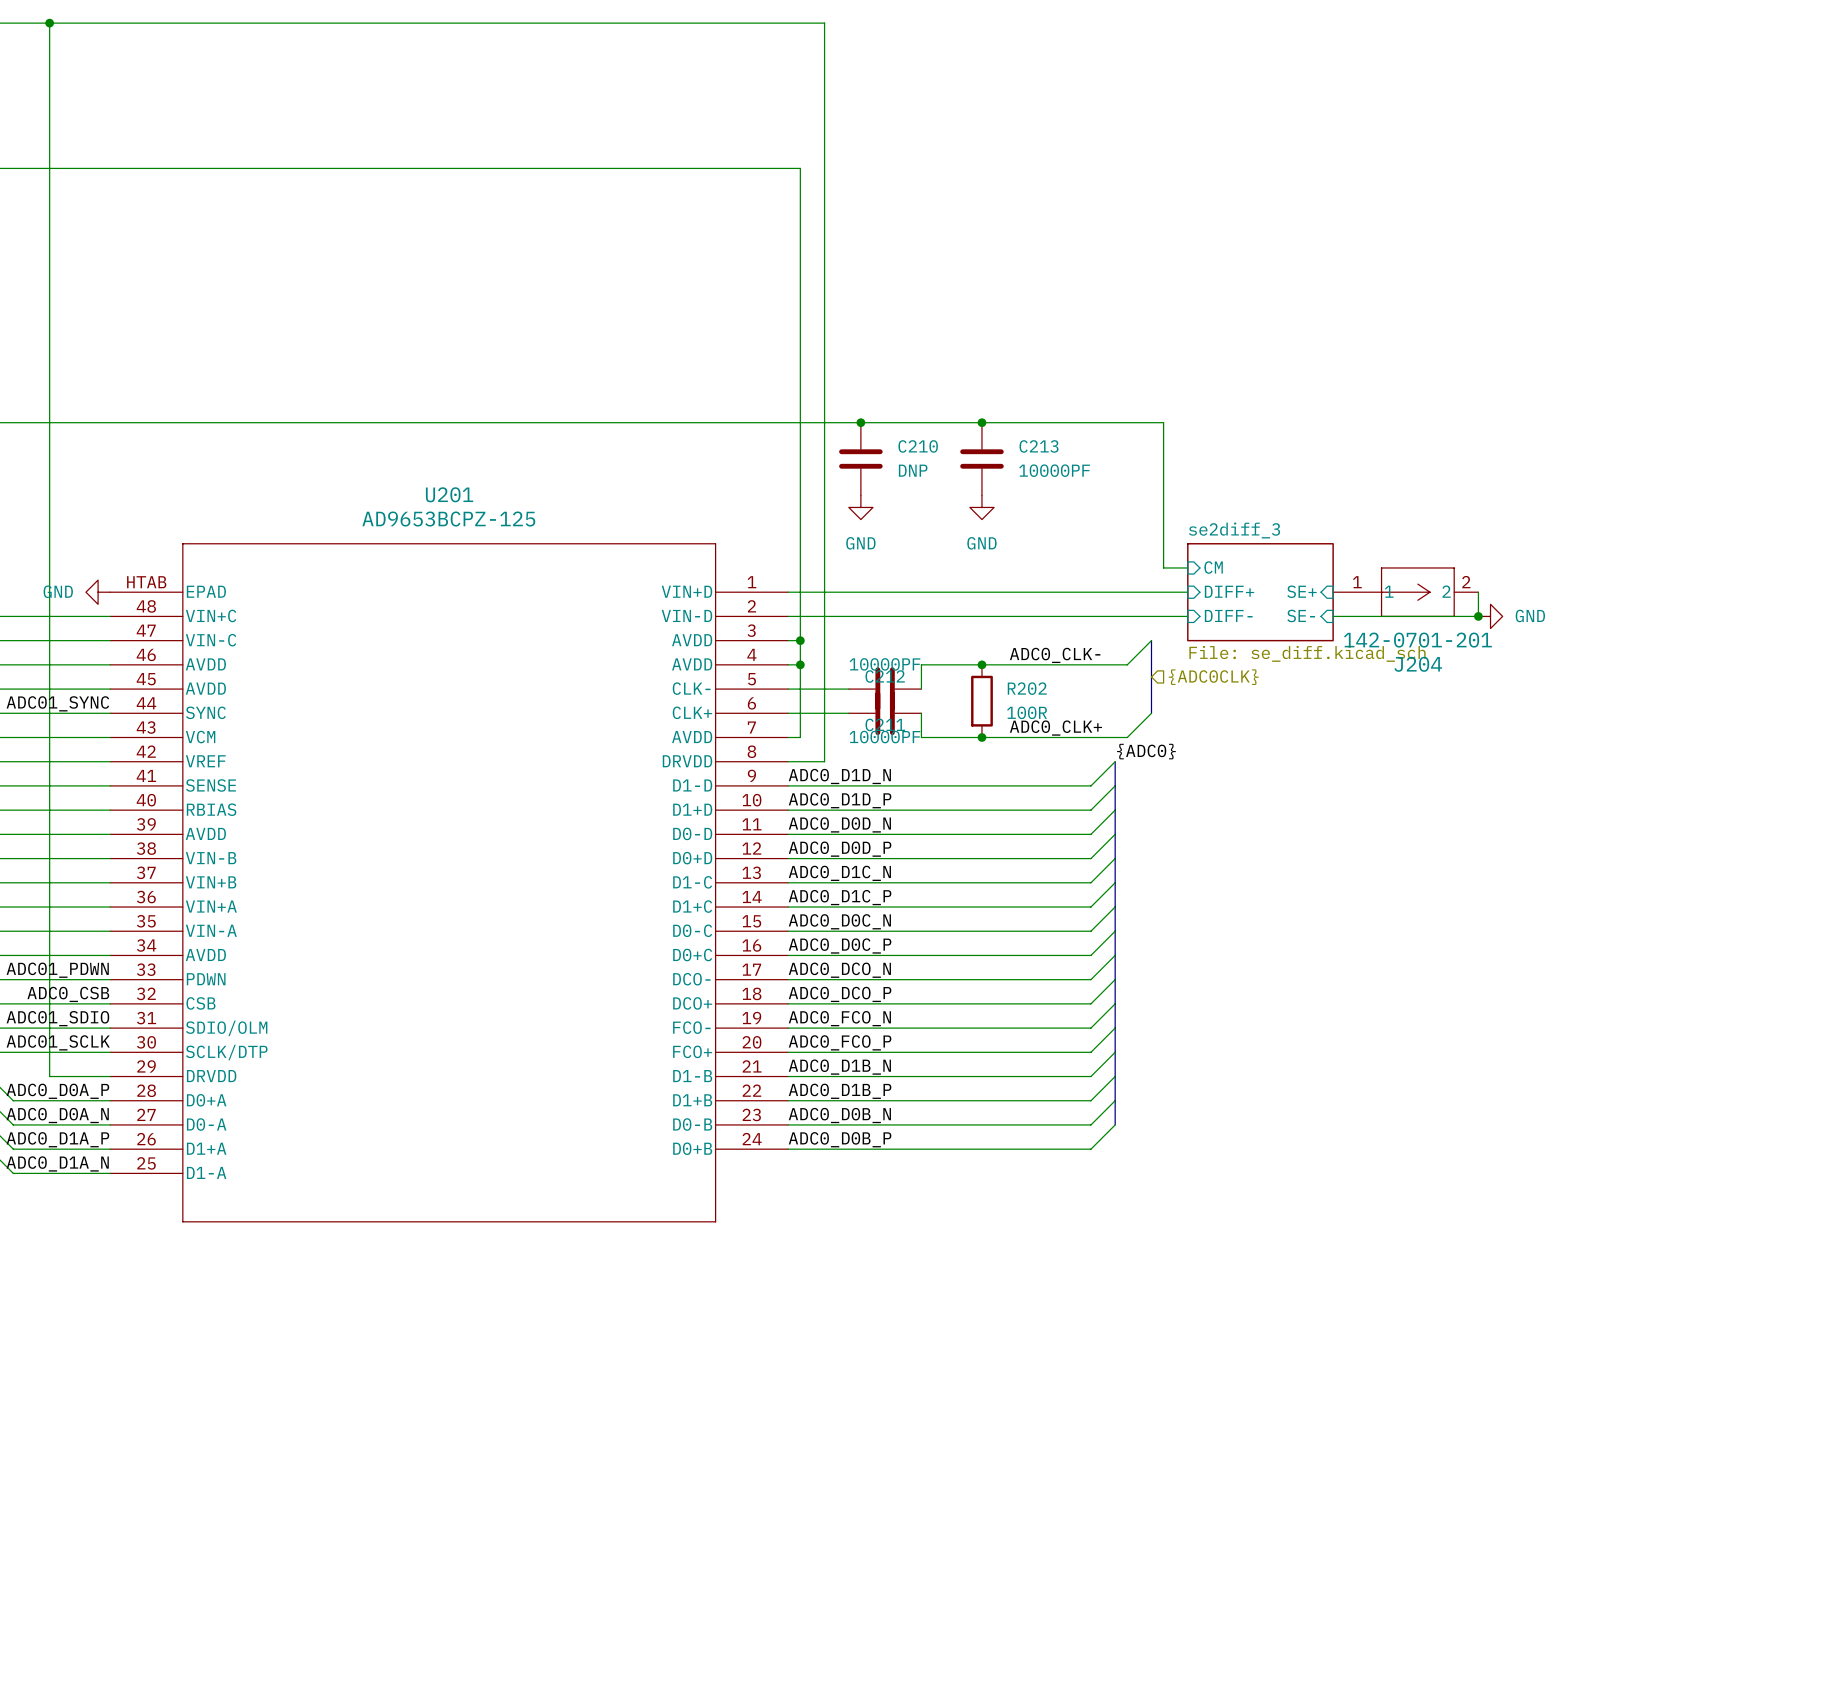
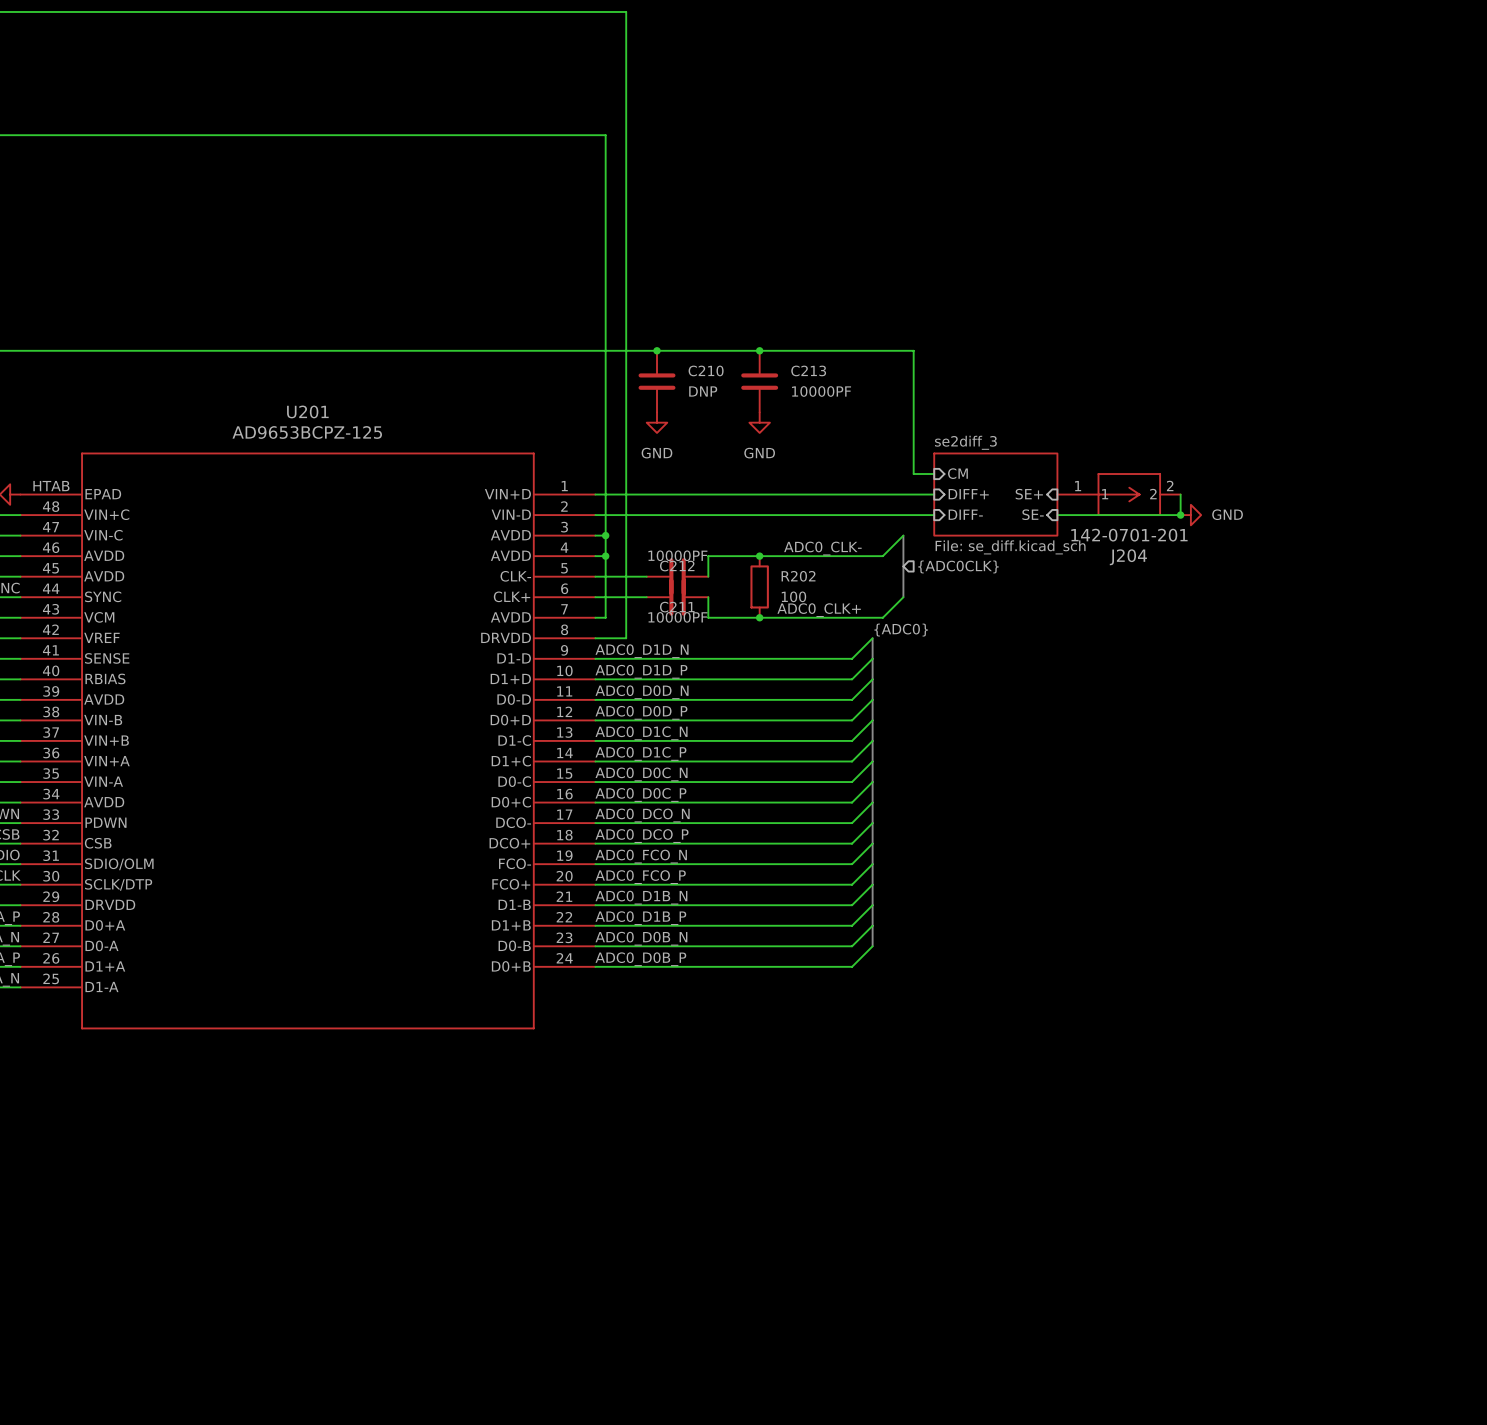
R202 value: 100R (1027, 712) -> 100 (793, 596)

